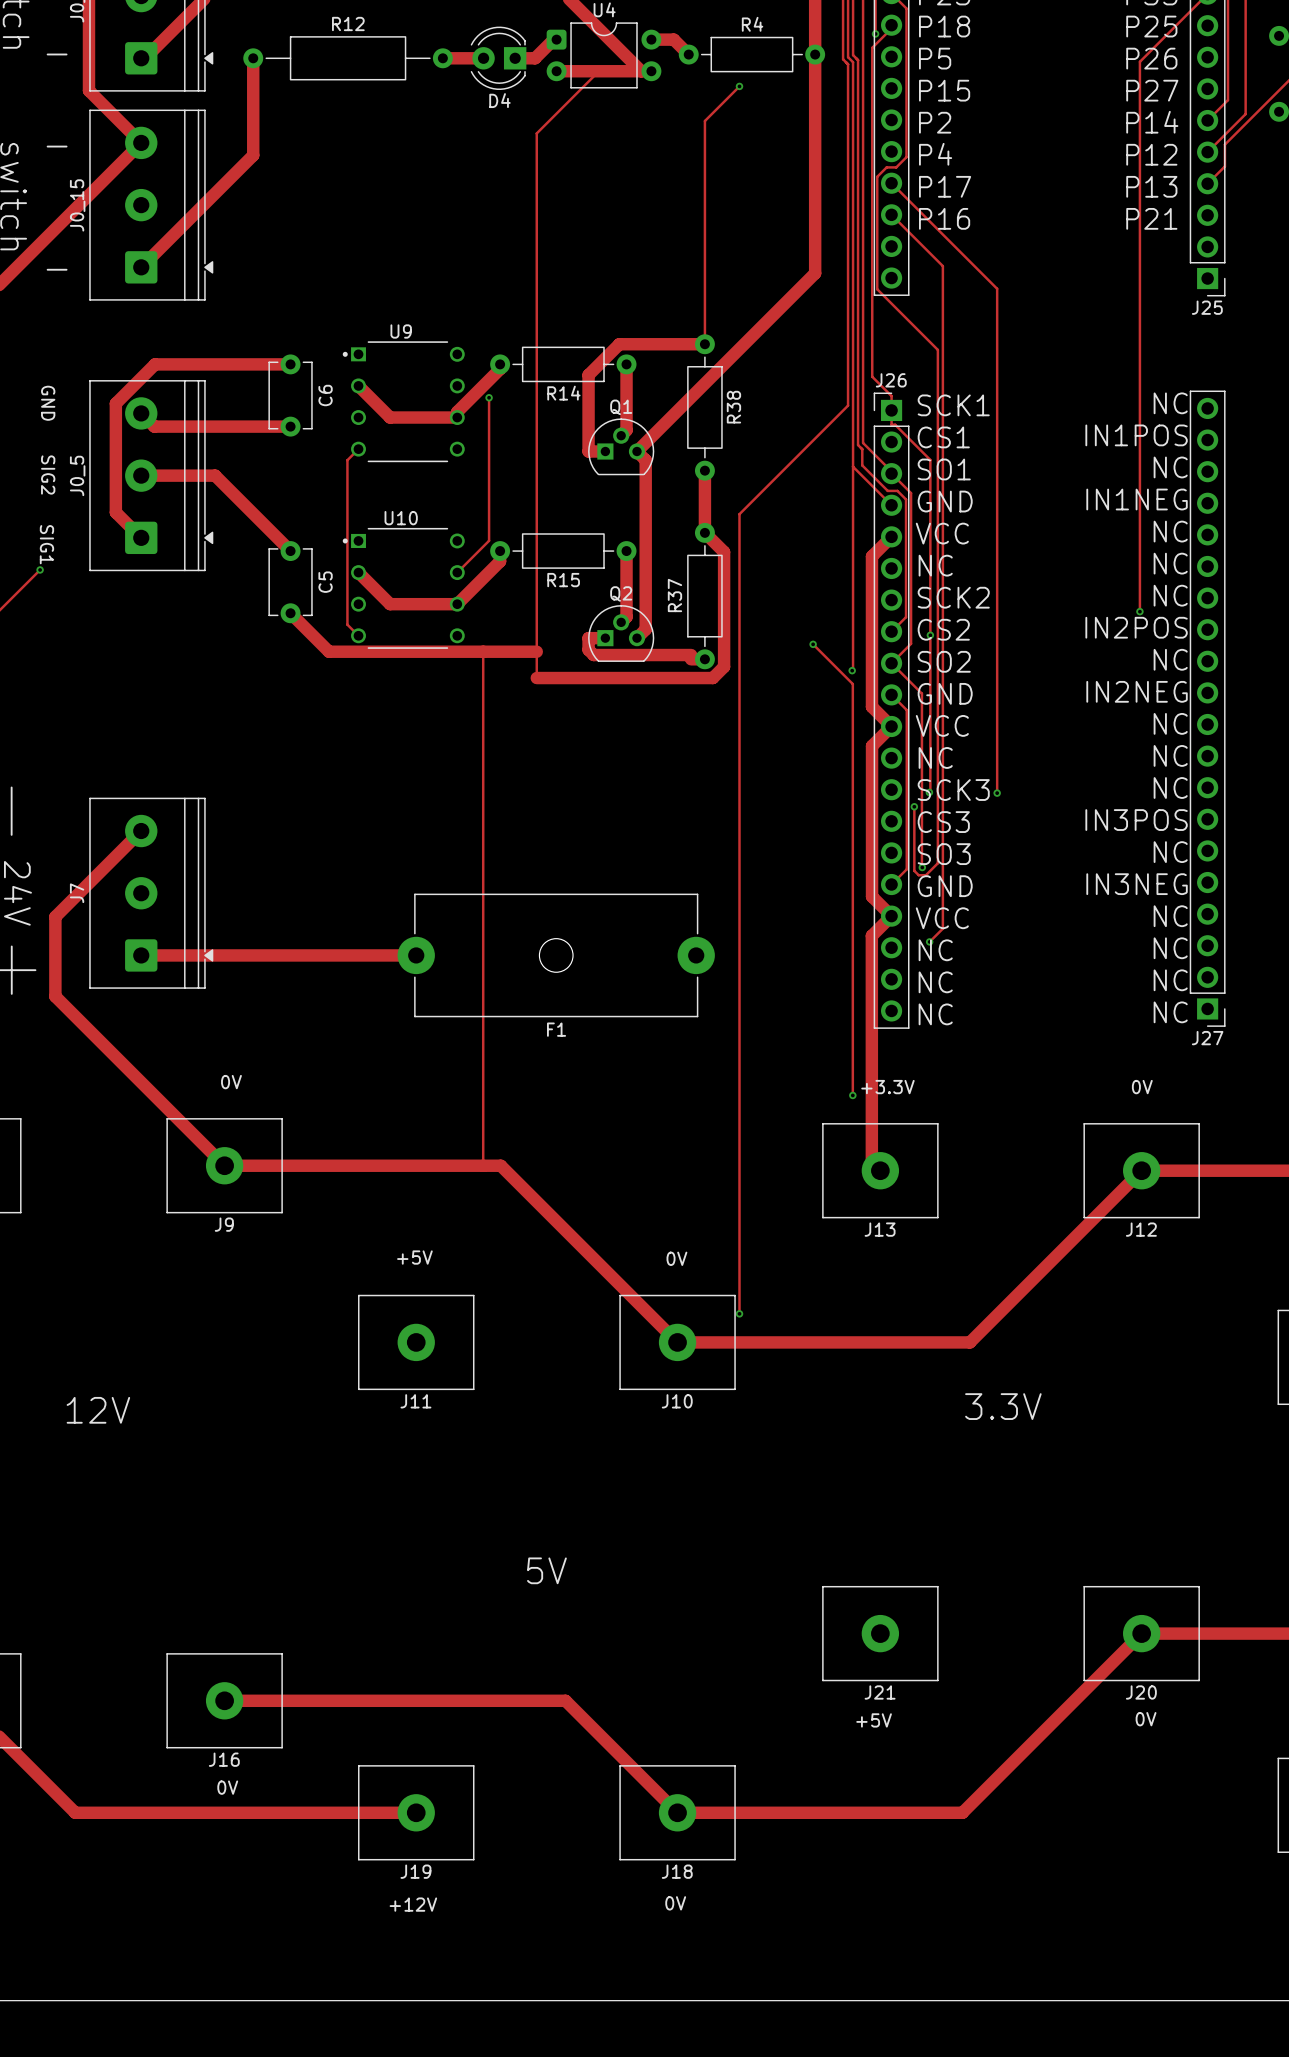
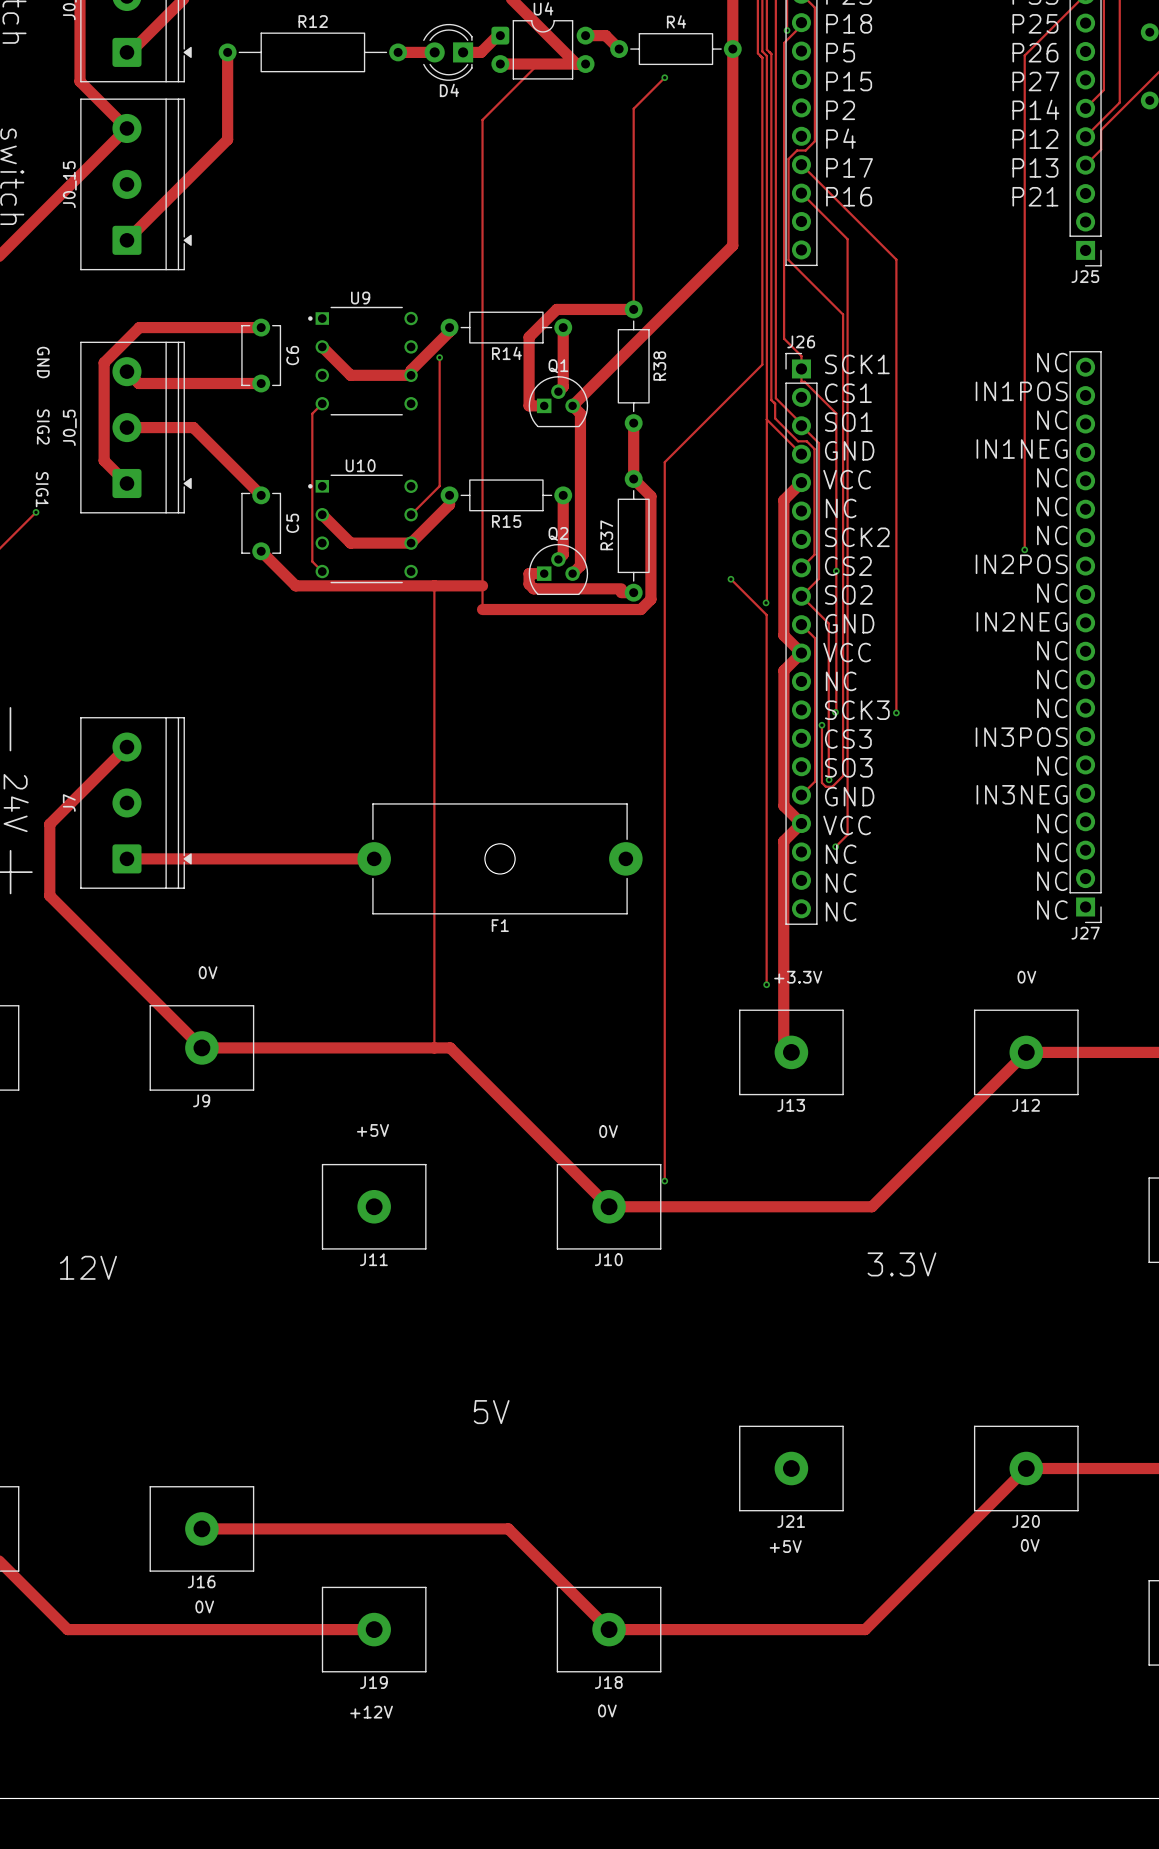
text: - (57, 54) -> none
text: - (57, 146) -> none
text: - (57, 269) -> none

